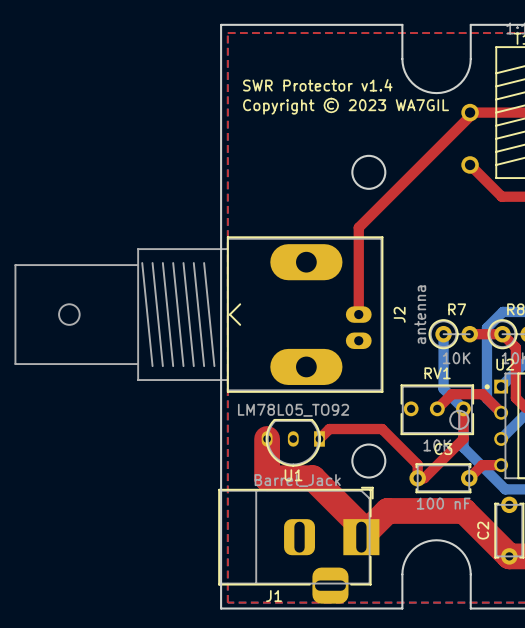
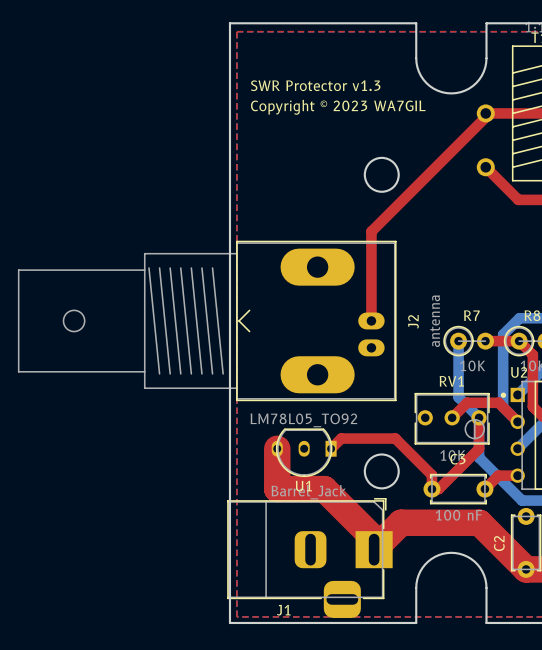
text: SWR Protector v1.4 (317, 85) -> SWR Protector v1.3 (315, 85)

